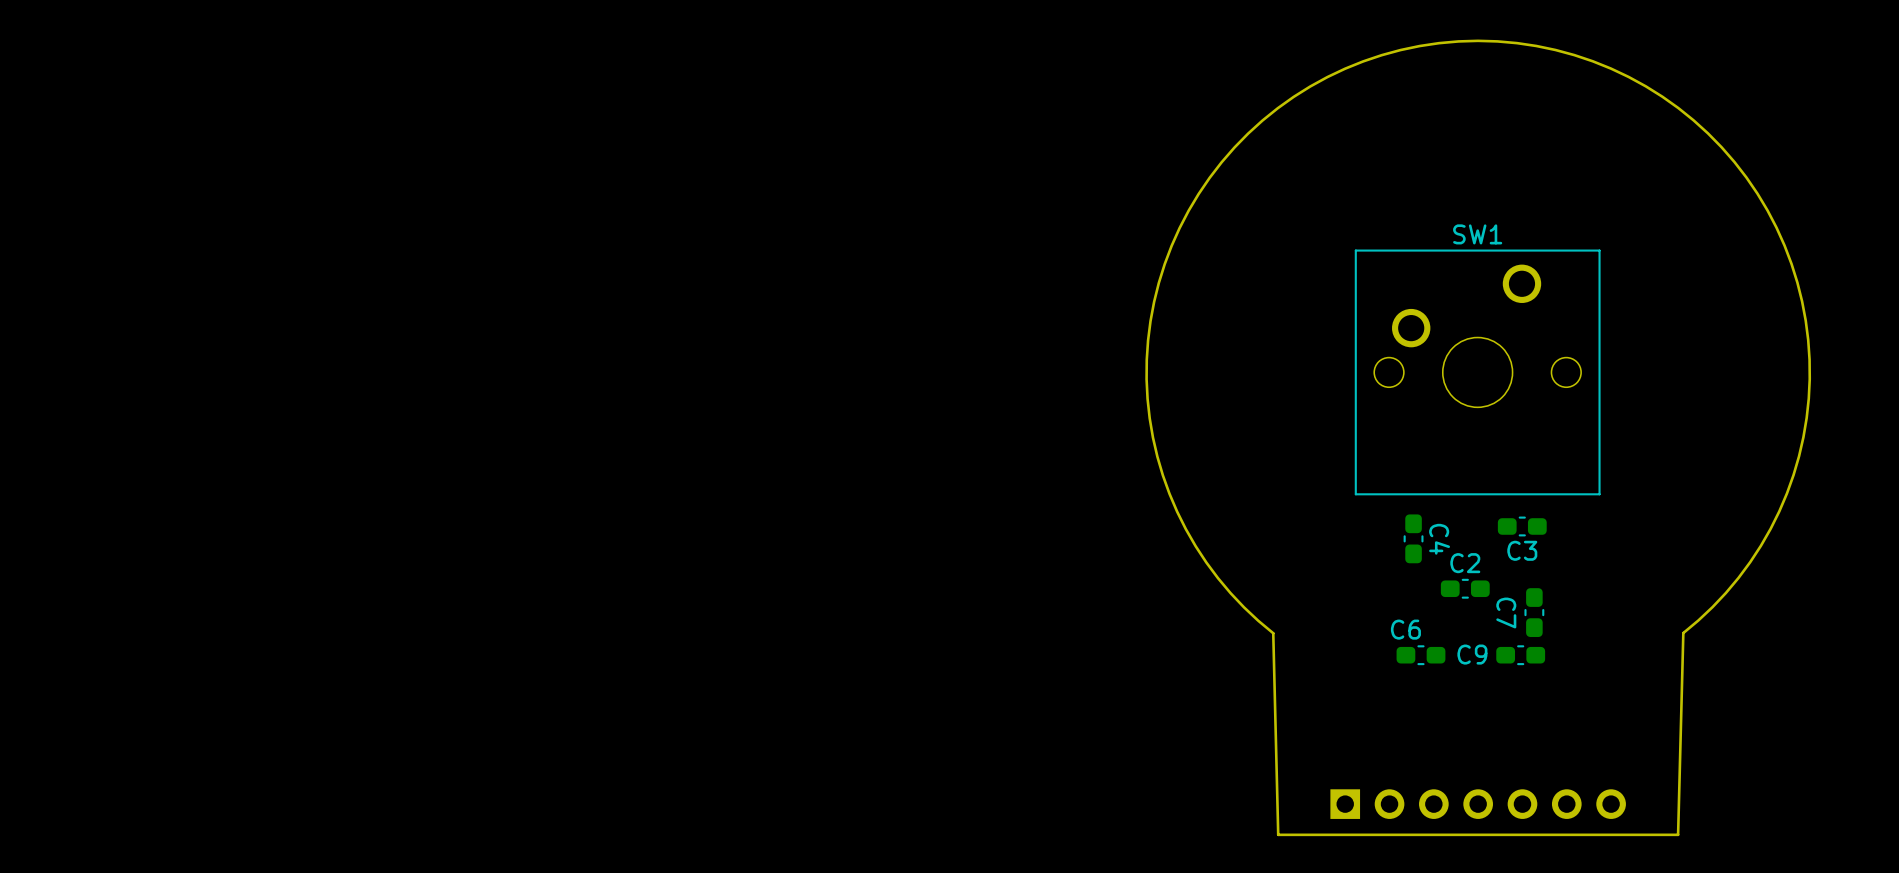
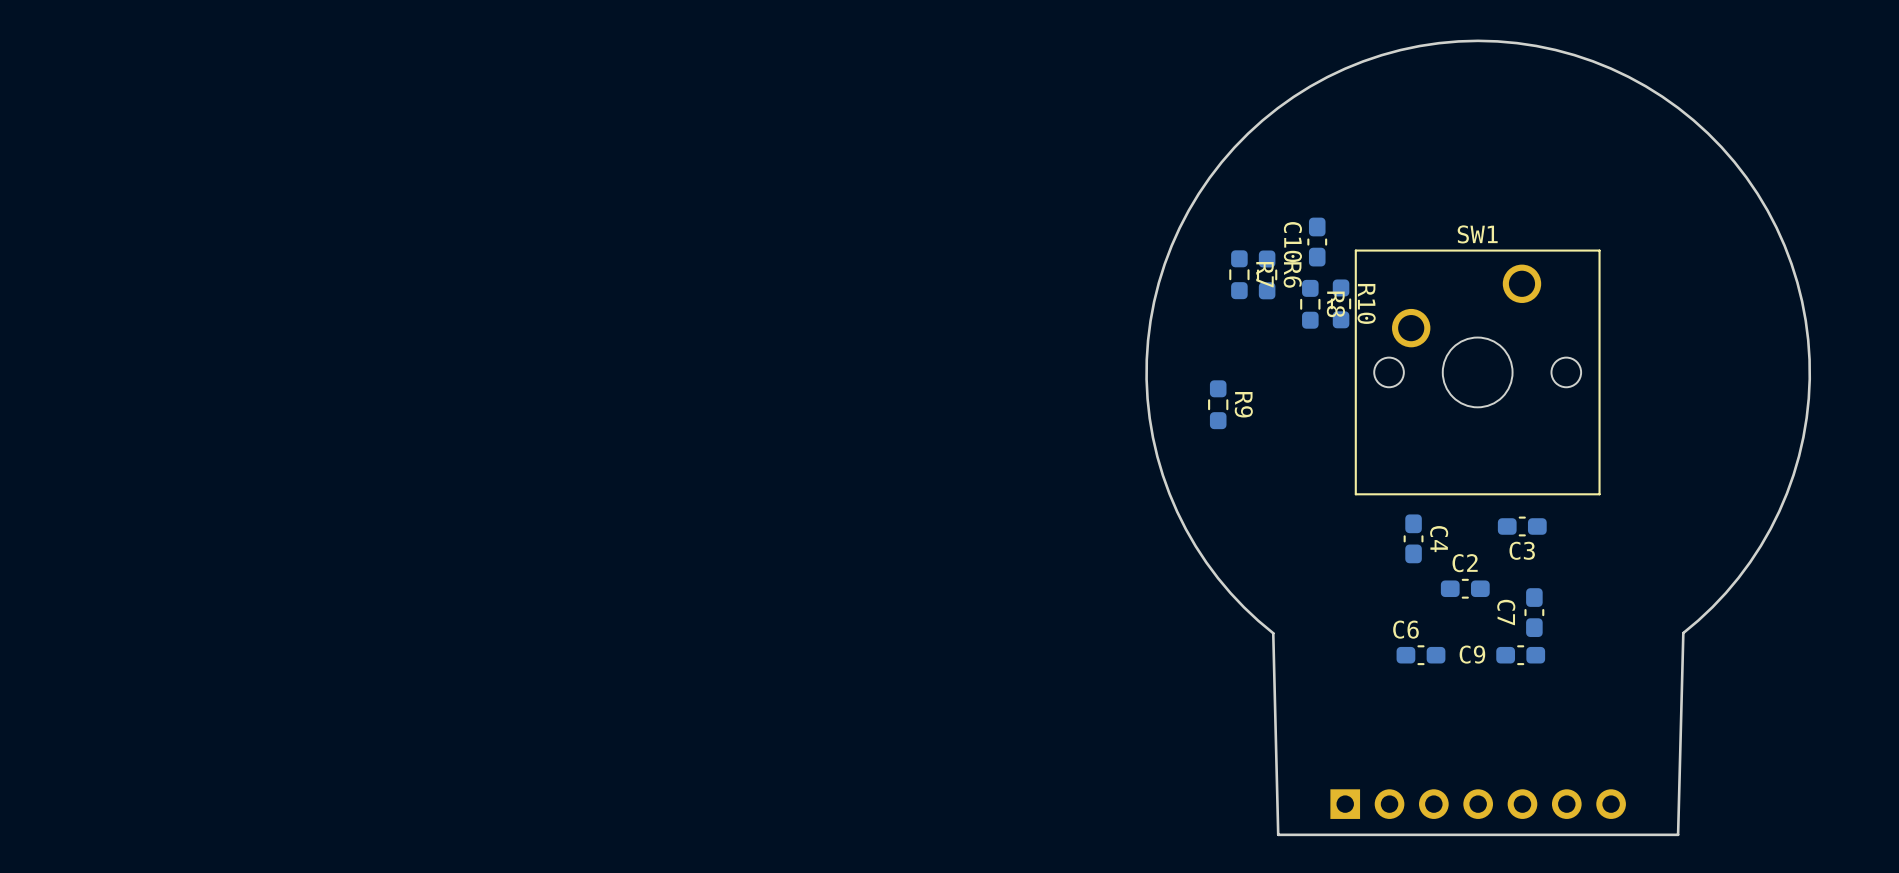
C10: none -> (1317, 242)
R7: none -> (1239, 274)
R6: none -> (1267, 274)
R10: none -> (1341, 303)
R8: none -> (1310, 304)
R9: none -> (1218, 404)

